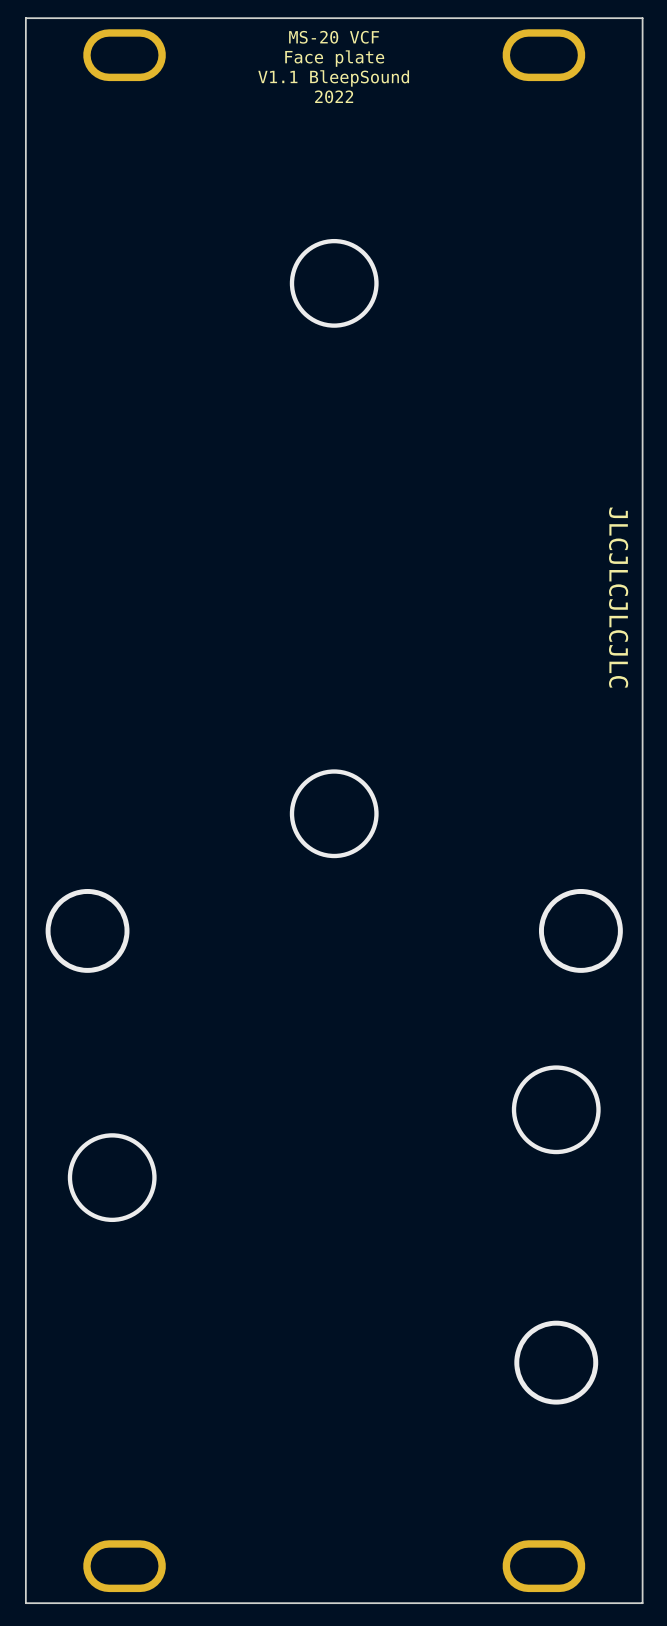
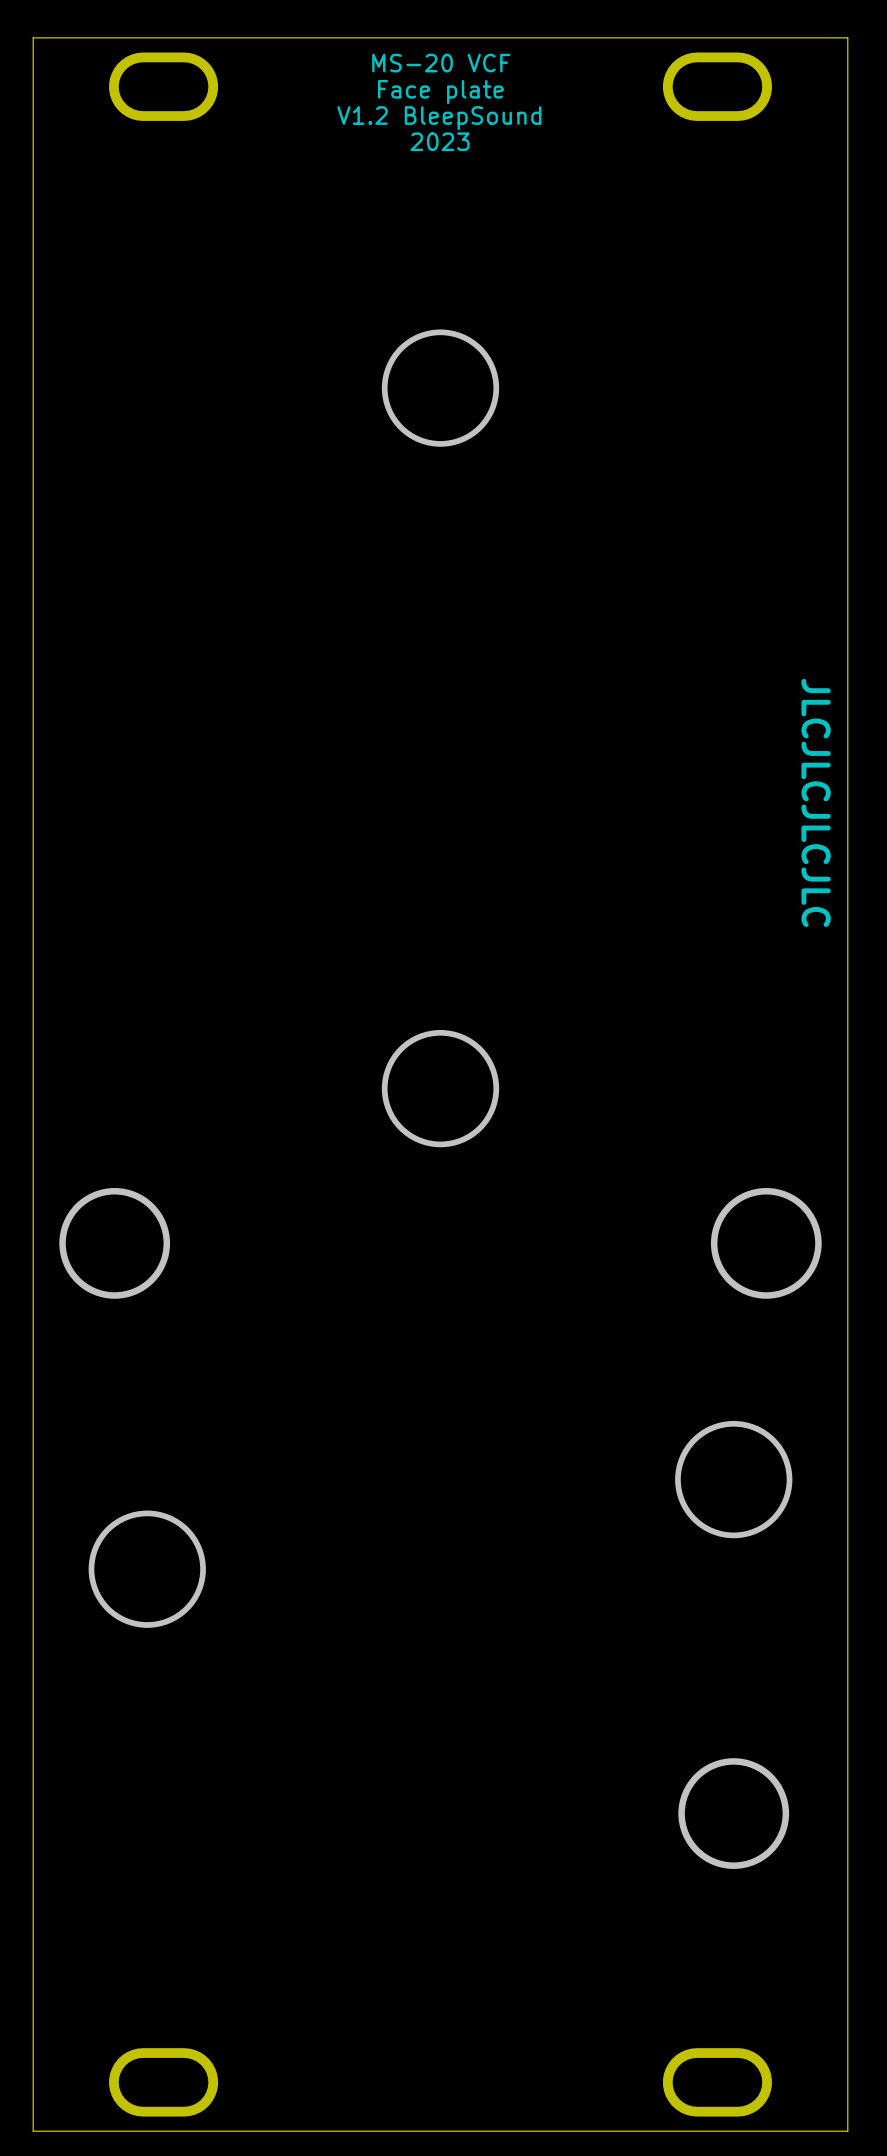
text: V1.1 BleepSound (333, 78) -> V1.2 BleepSound (439, 118)
text: 2022 (334, 96) -> 2023 (440, 141)

